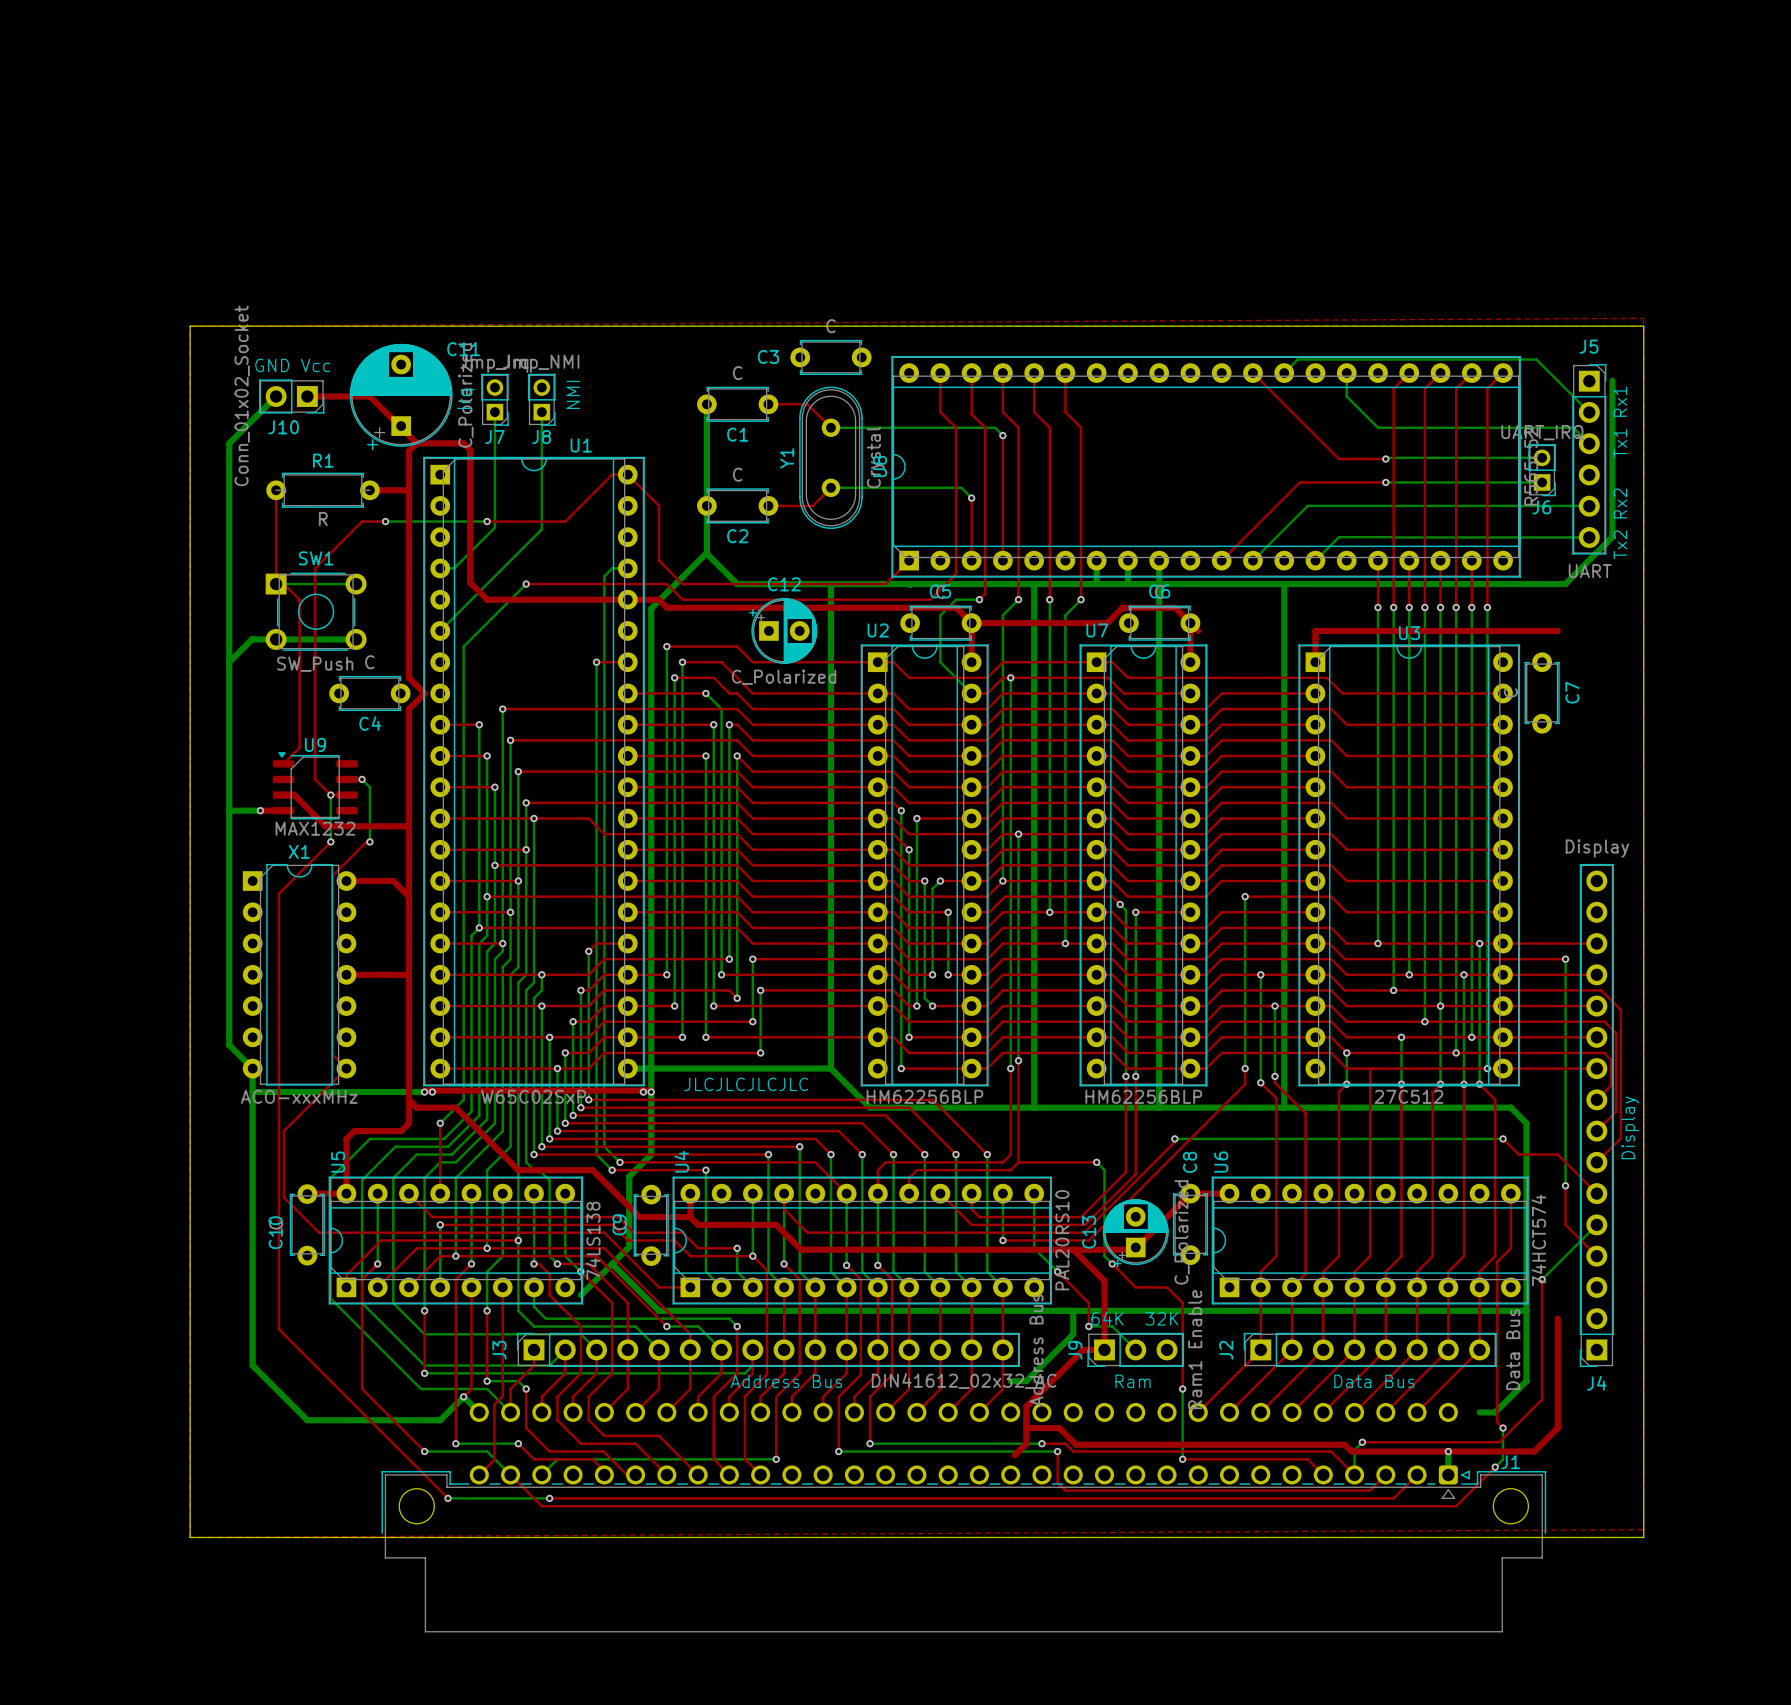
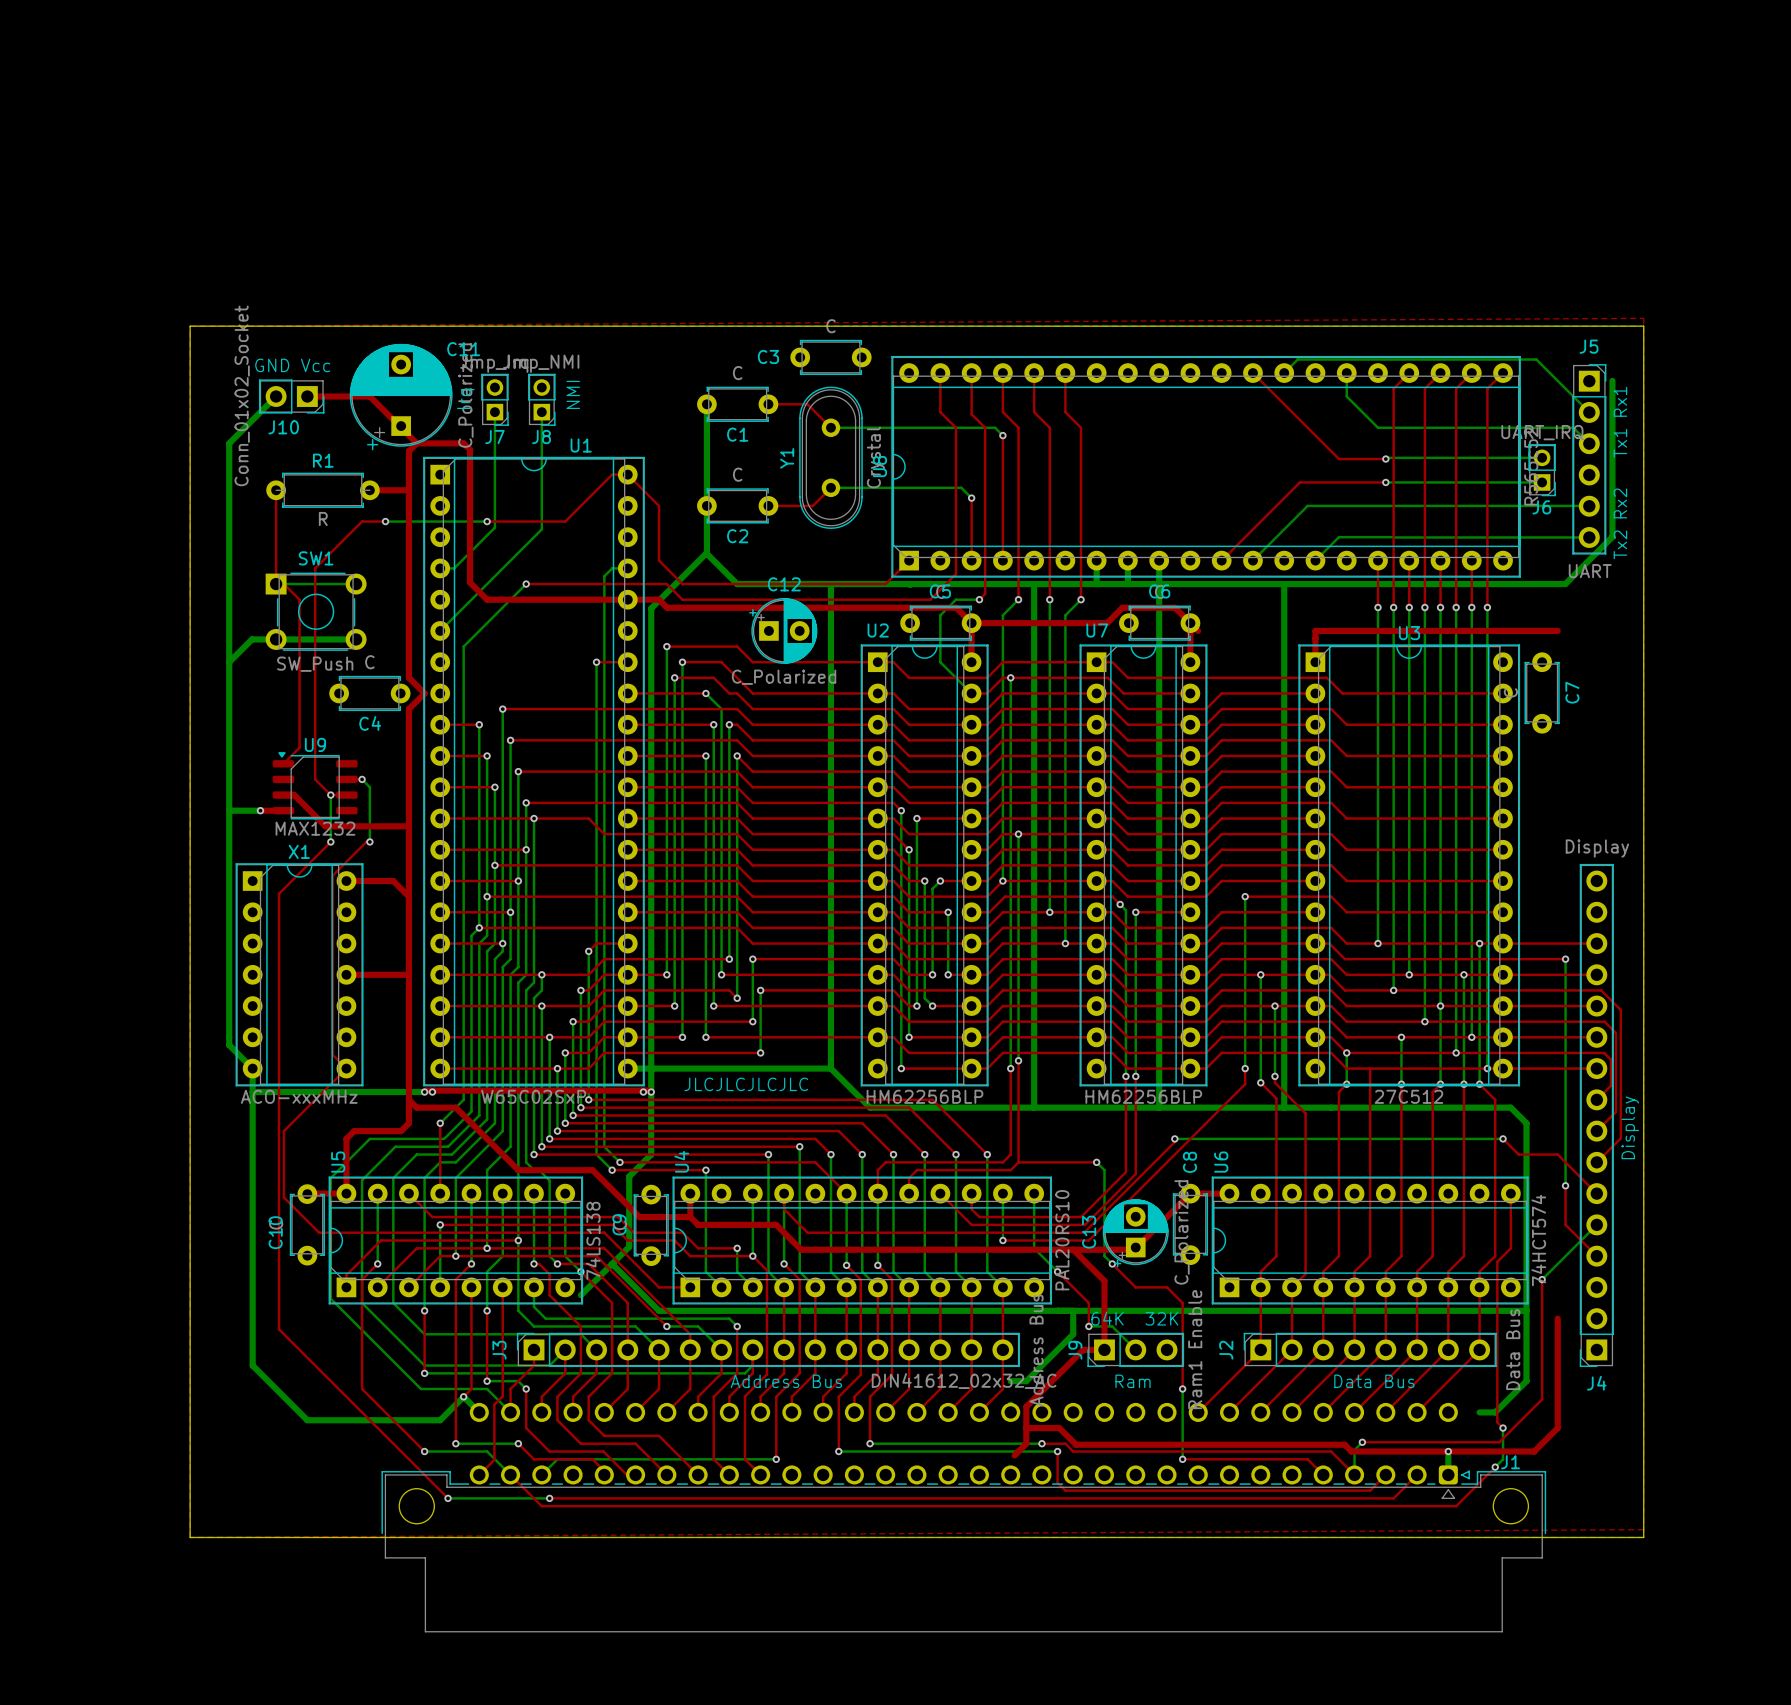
X1 footprint: [242, 863, 357, 1086] -> [235, 863, 364, 1087]

